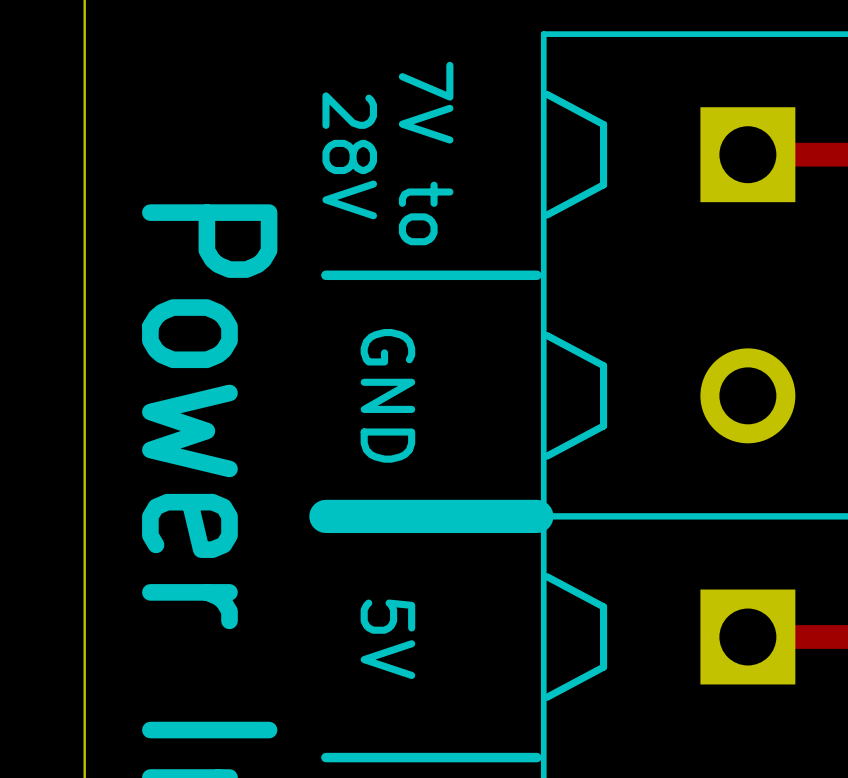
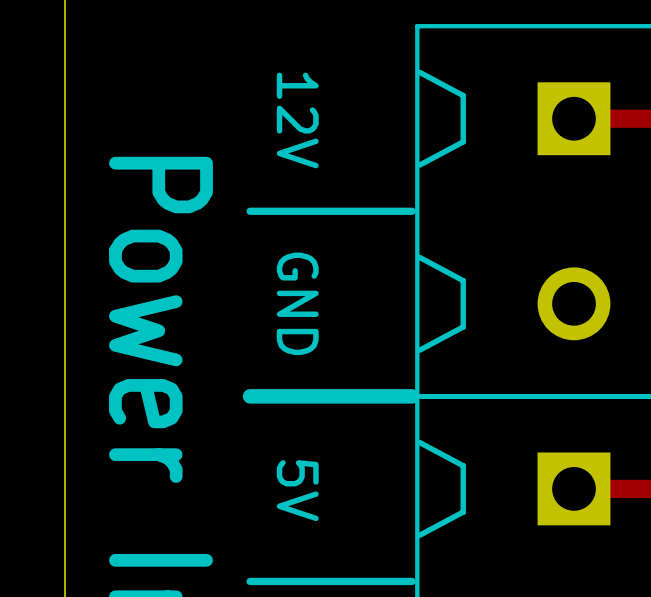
text: 7V to (426, 153) -> none
text: 28V (349, 155) -> 12V (297, 120)
line width: thick (325, 516) (536, 516) -> thin (250, 396) (412, 396)

